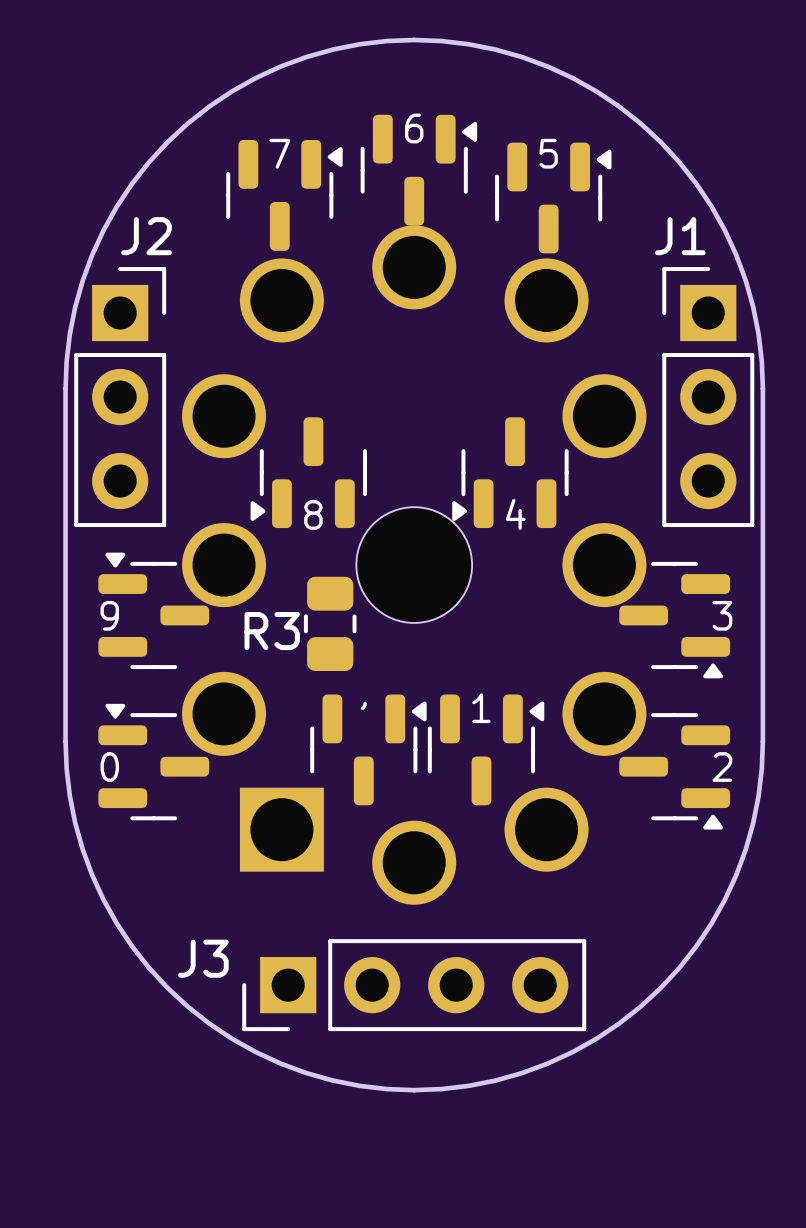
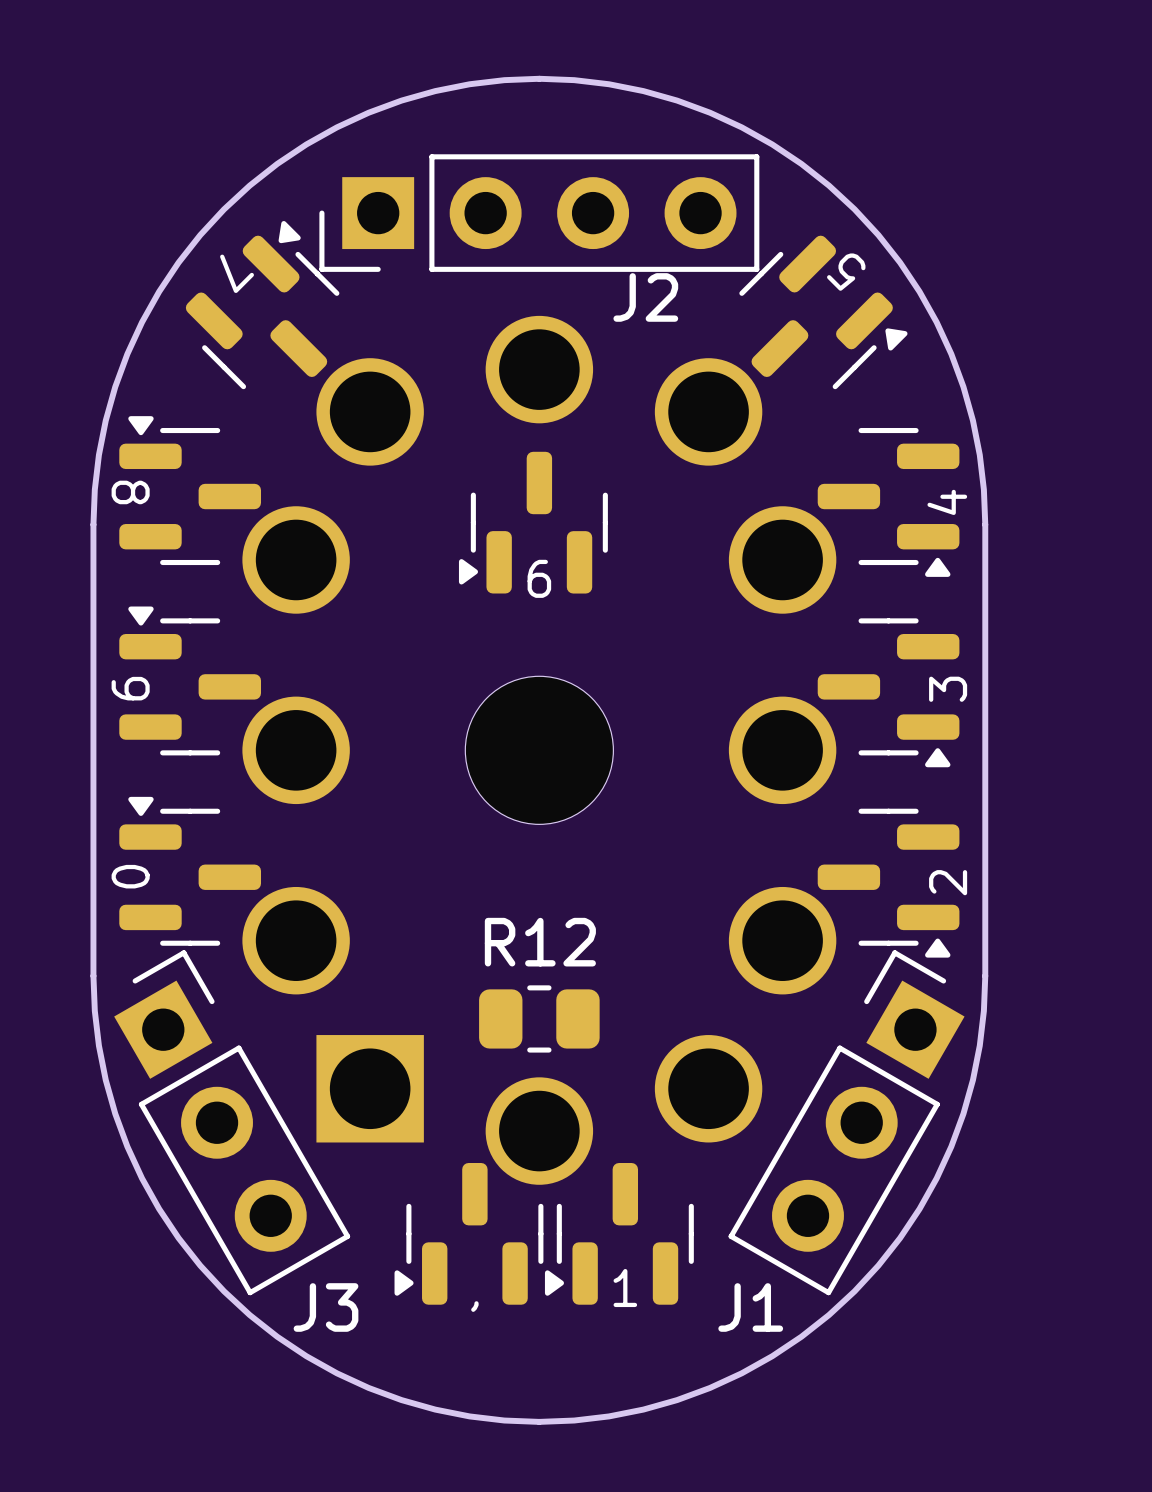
text position: 6 (414, 128) -> 6 (539, 578)
text rotation: 0° (279, 153) -> 135° clockwise (237, 273)
text position: 7 (279, 153) -> 7 (237, 273)
text rotation: 0° (548, 153) -> 135° counterclockwise (846, 272)
text position: 5 (548, 153) -> 5 (846, 272)
part: (418, 170) -> none
part: (284, 195) -> none
part: (553, 197) -> none
part: none -> (262, 305)
part: none -> (823, 312)
J2 name position: J2 (146, 236) -> J2 (645, 297)
J1 name position: J1 (680, 236) -> J1 (750, 1307)
J2 footprint: [74, 267, 167, 528] -> [319, 154, 760, 272]
part: none -> (190, 490)
part: none -> (888, 502)
part: none -> (533, 522)
J1 rotation: 0° (708, 397) -> 30° clockwise (846, 1122)
J1 position: (708, 397) -> (846, 1122)
part: (308, 472) -> none
part: (510, 472) -> none
part: none -> (190, 680)
text rotation: 0° (313, 514) -> 90° clockwise (130, 492)
text position: 8 (313, 514) -> 8 (130, 492)
text rotation: 0° (515, 514) -> 90° counterclockwise (947, 502)
text position: 4 (515, 514) -> 4 (947, 502)
part: none -> (888, 692)
part: (153, 610) -> none
text rotation: 0° (109, 615) -> 90° clockwise (130, 688)
text position: 9 (109, 615) -> 9 (130, 688)
text rotation: 0° (722, 615) -> 90° counterclockwise (948, 689)
text position: 3 (722, 615) -> 3 (948, 689)
part: (674, 620) -> none
R3: (330, 623) -> none
part: none -> (190, 871)
part: none -> (888, 883)
text position: , (363, 705) -> , (474, 1306)
text position: 1 (481, 708) -> 1 (625, 1288)
part: (368, 749) -> none
part: (486, 749) -> none
part: (153, 762) -> none
text rotation: 0° (109, 767) -> 90° clockwise (130, 876)
text position: 0 (109, 767) -> 0 (130, 876)
text rotation: 0° (722, 767) -> 90° counterclockwise (948, 882)
text position: 2 (722, 767) -> 2 (948, 882)
part: (674, 771) -> none
R12: none -> (539, 1018)
J3 footprint: [242, 939, 587, 1032] -> [114, 950, 351, 1296]
part: none -> (468, 1233)
part: none -> (619, 1233)
J3 name position: J3 (203, 958) -> J3 (326, 1307)

